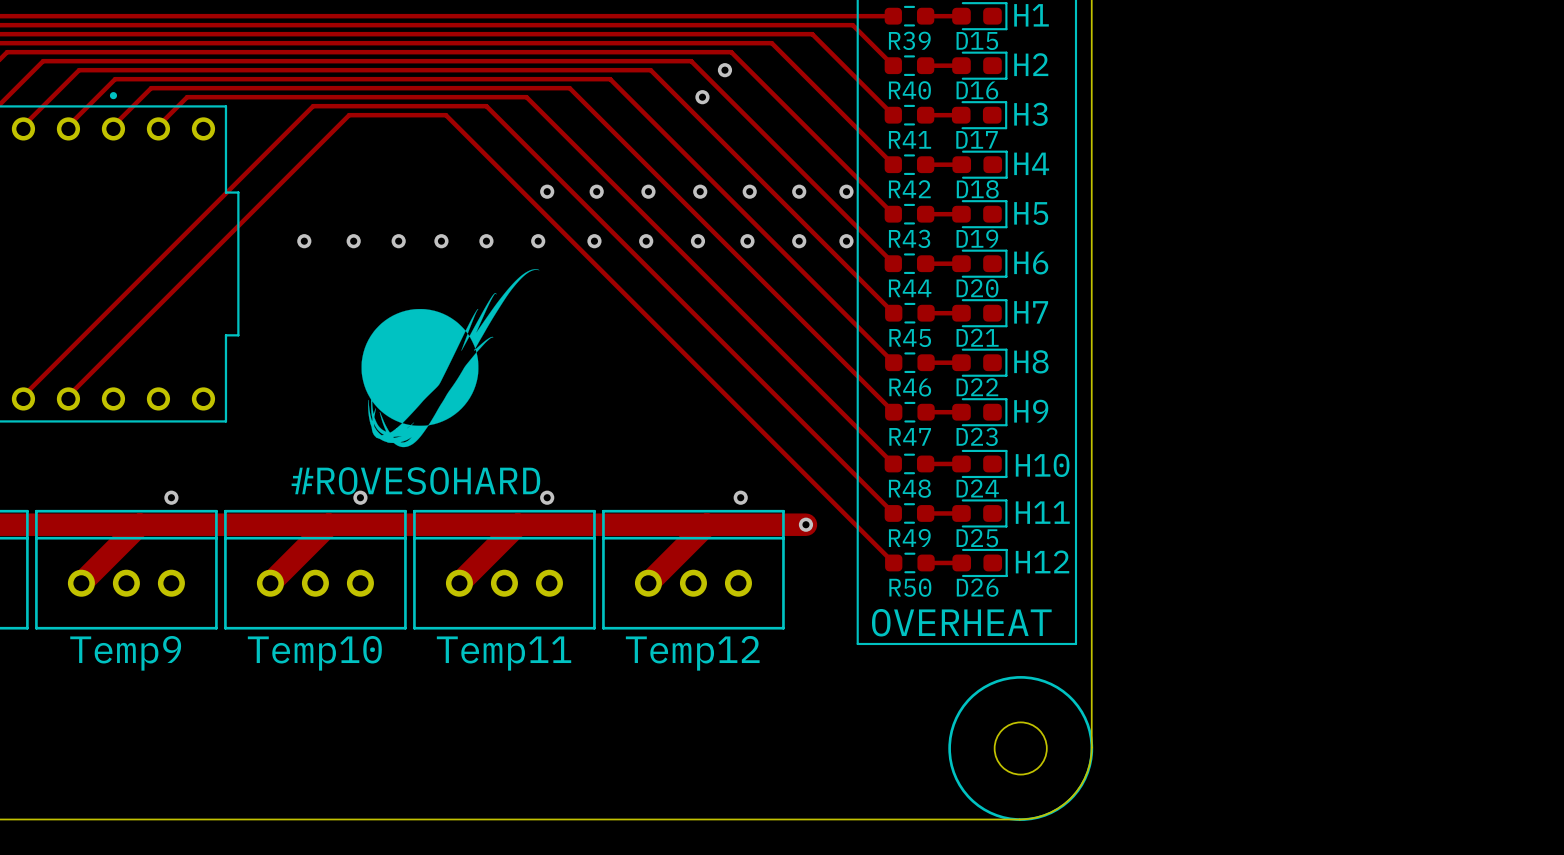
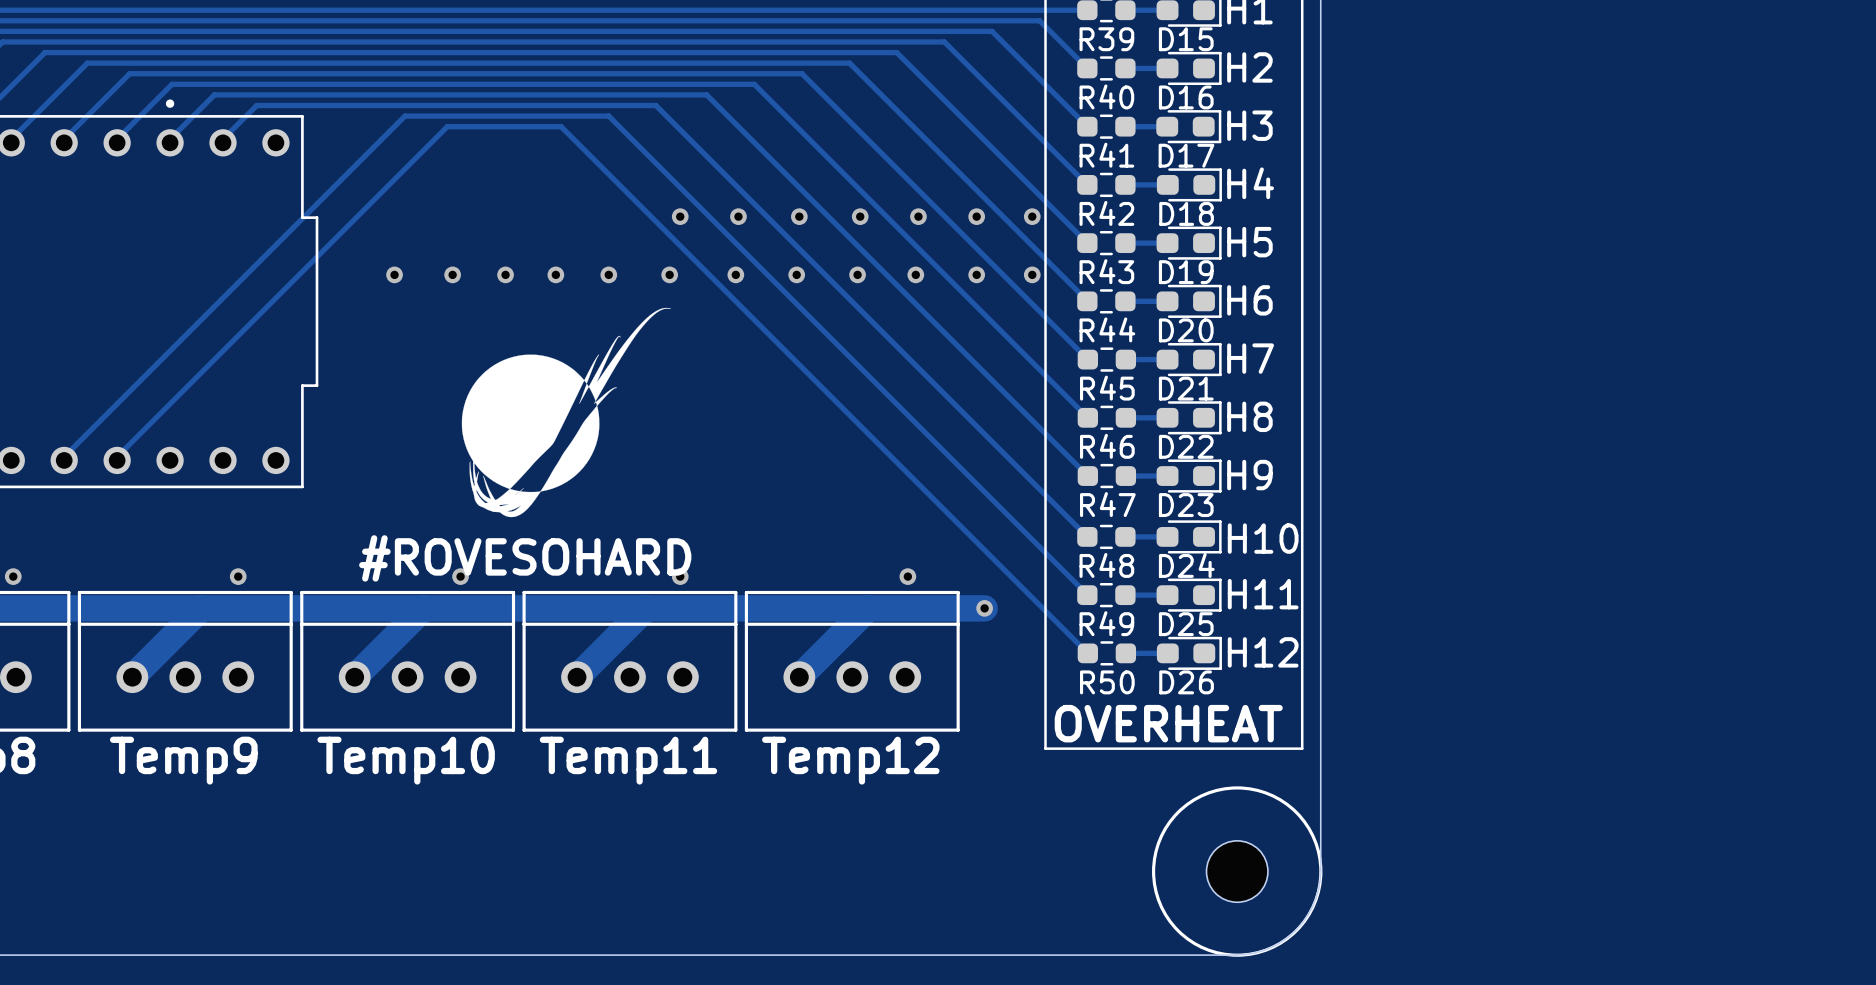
via: (724, 70) -> none
via: (702, 97) -> none

